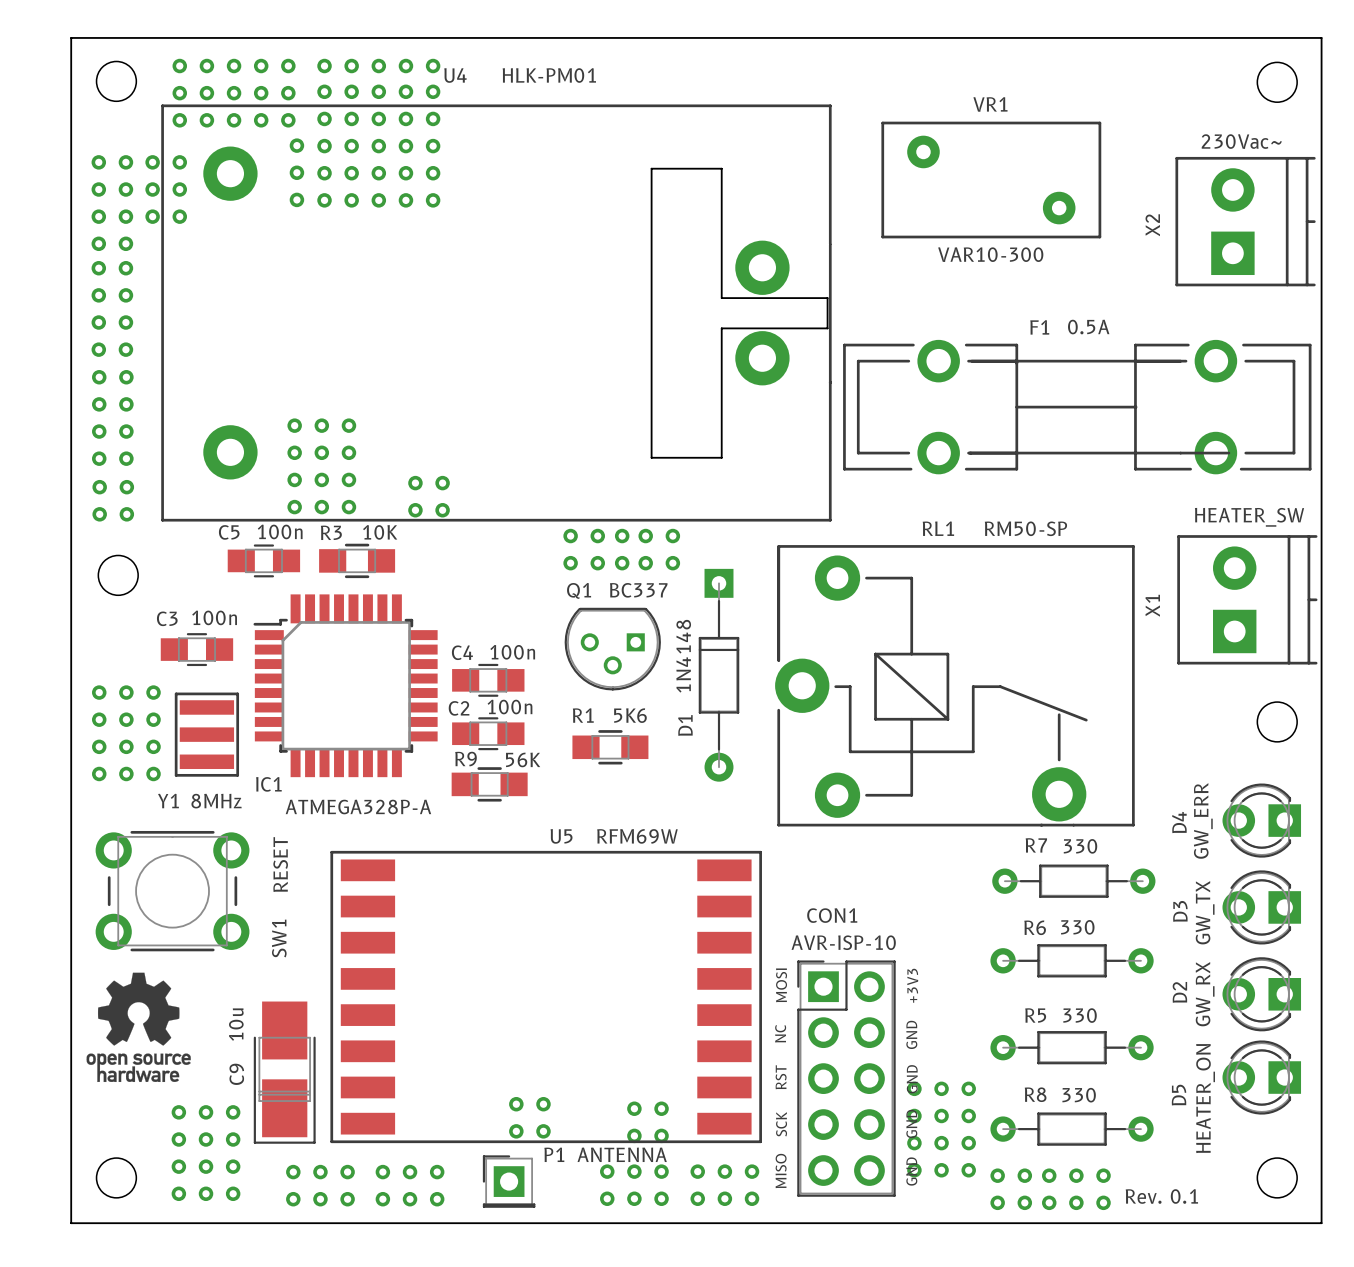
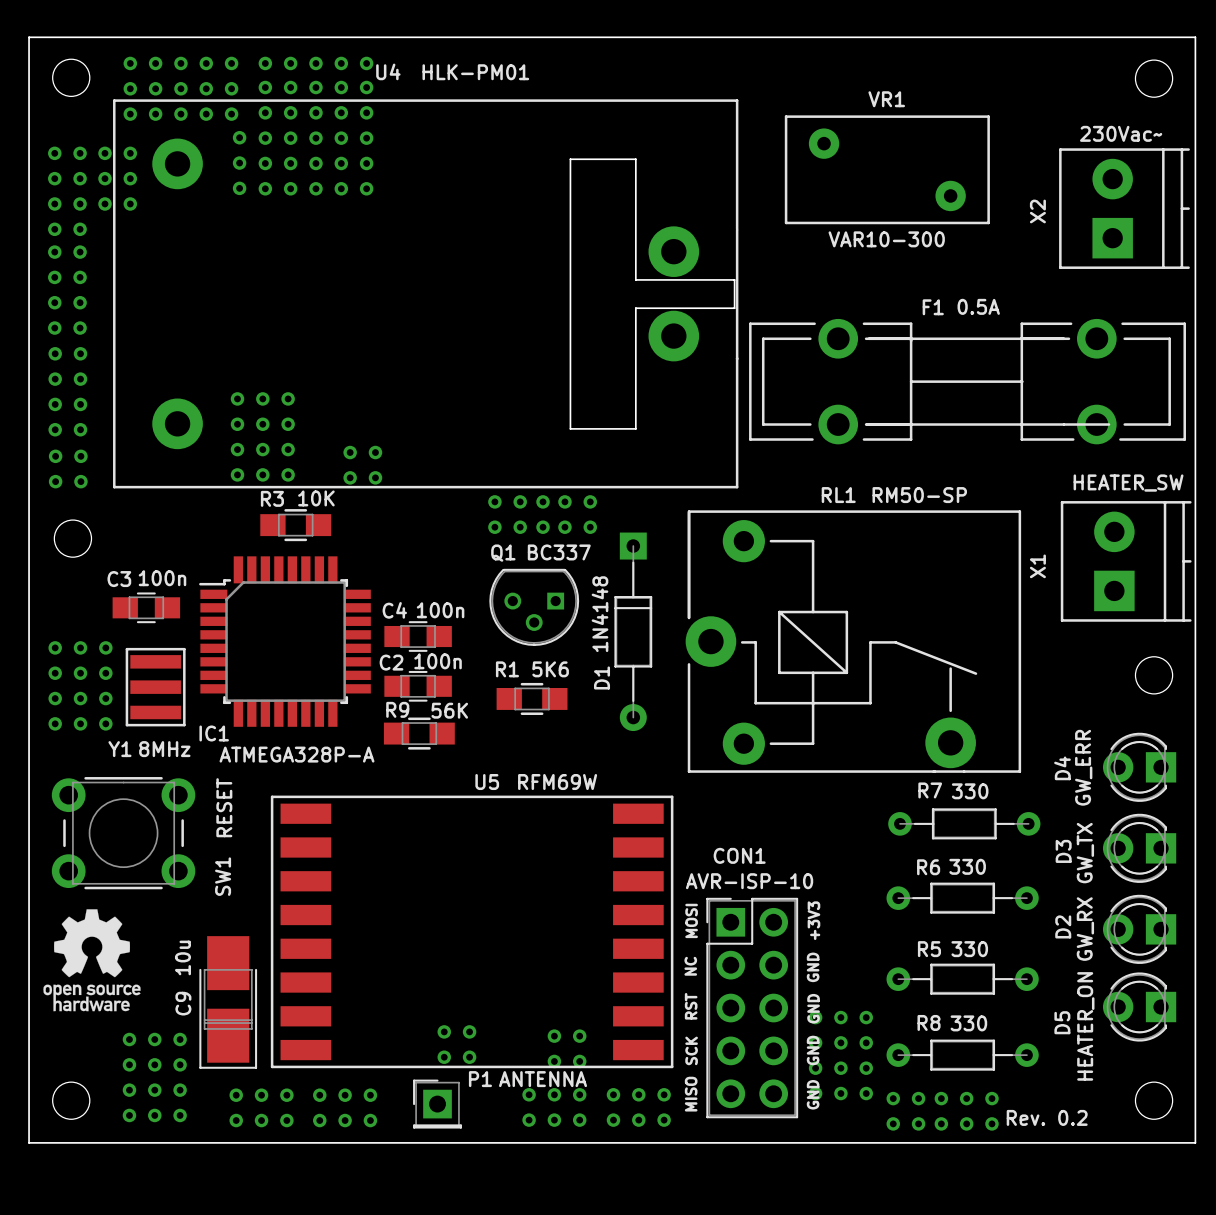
C5: 100n (263, 560) -> none
text: Rev. 0.1 (1161, 1196) -> Rev. 0.2 (1047, 1117)

